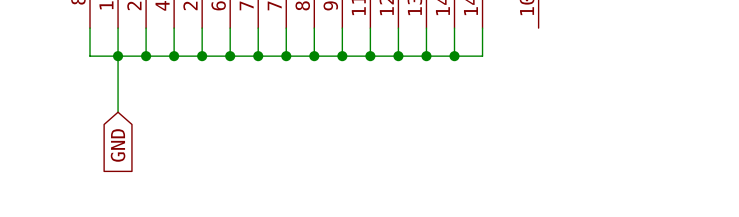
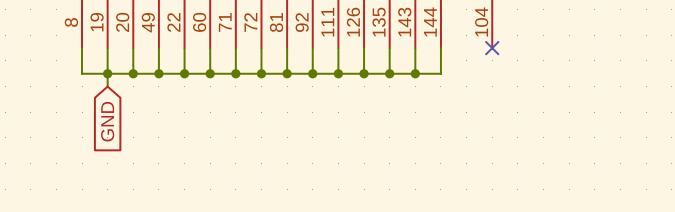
no-connect mark: none -> (492, 48)
wire: (118, 70) (118, 112) -> none
global label position: GND (118, 145) -> GND (107, 121)

